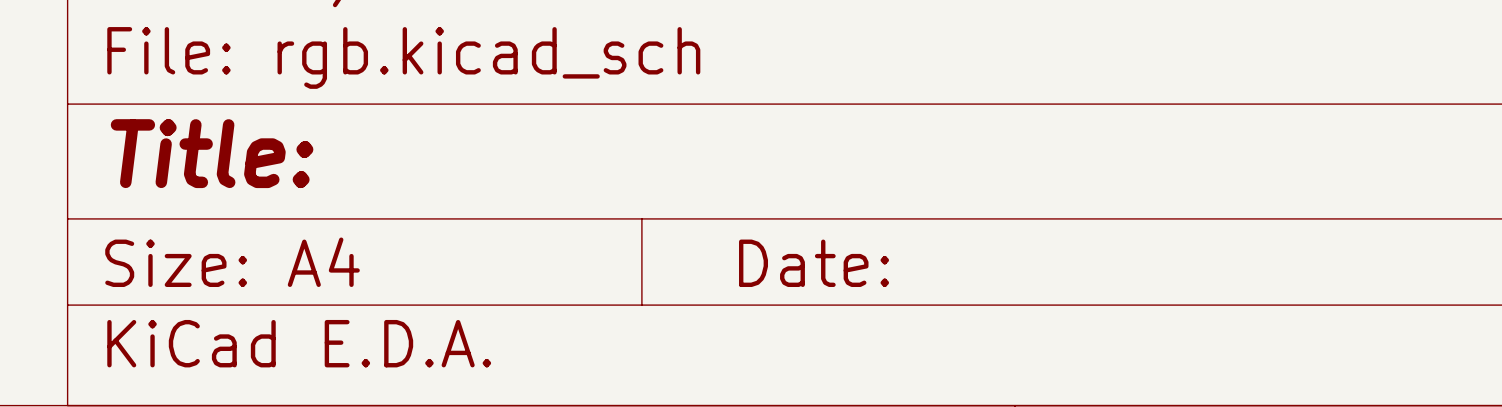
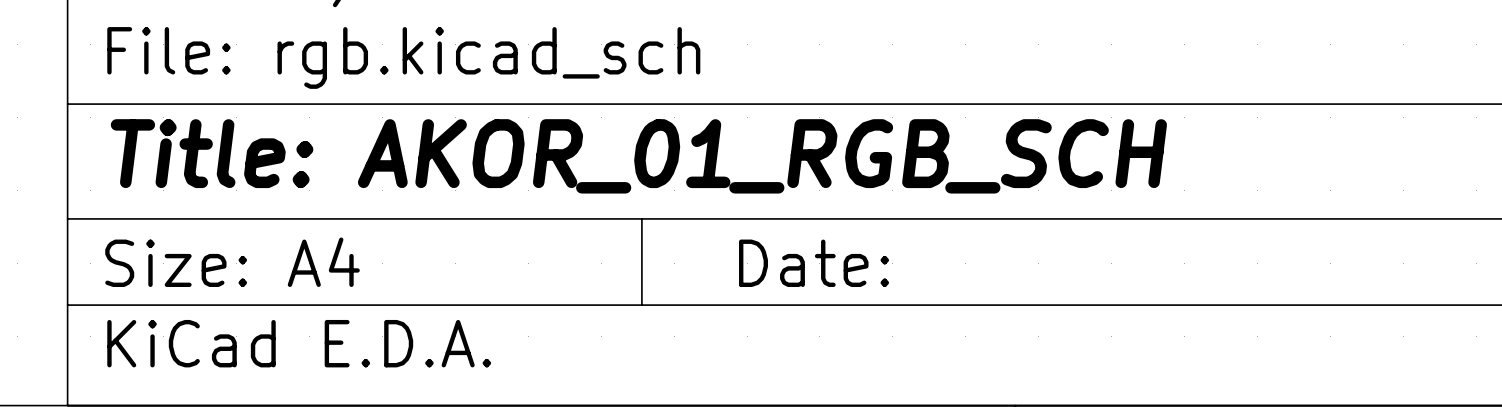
title block: Title: (212, 153) -> Title: AKOR_01_RGB_SCH (638, 156)

